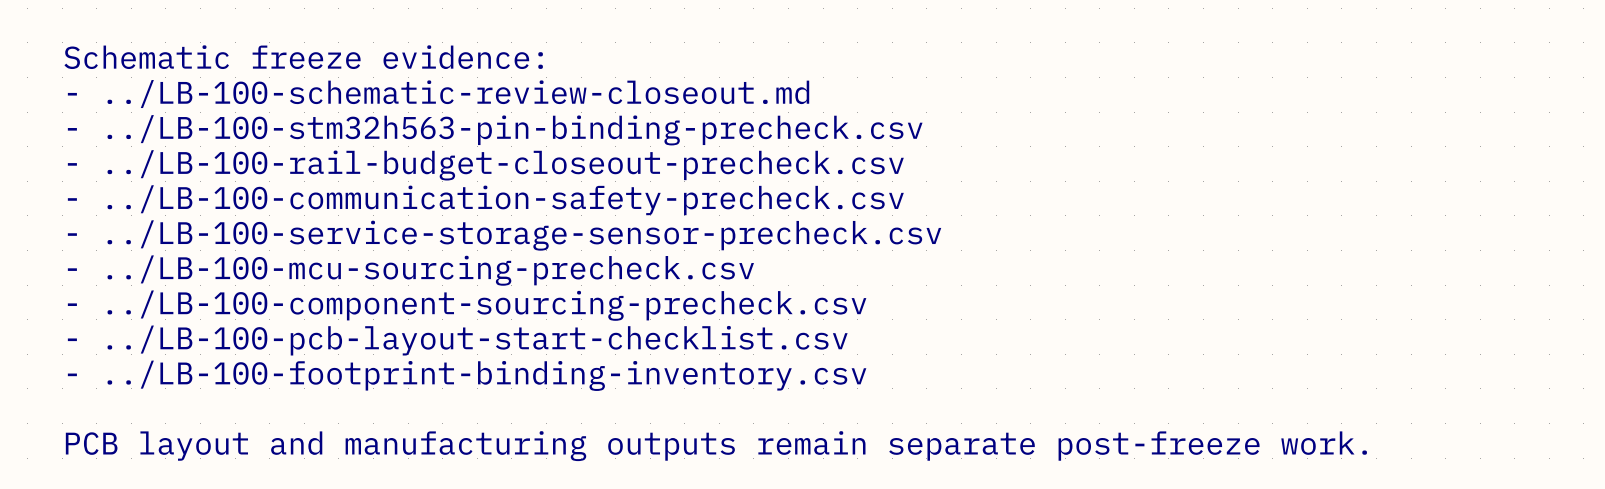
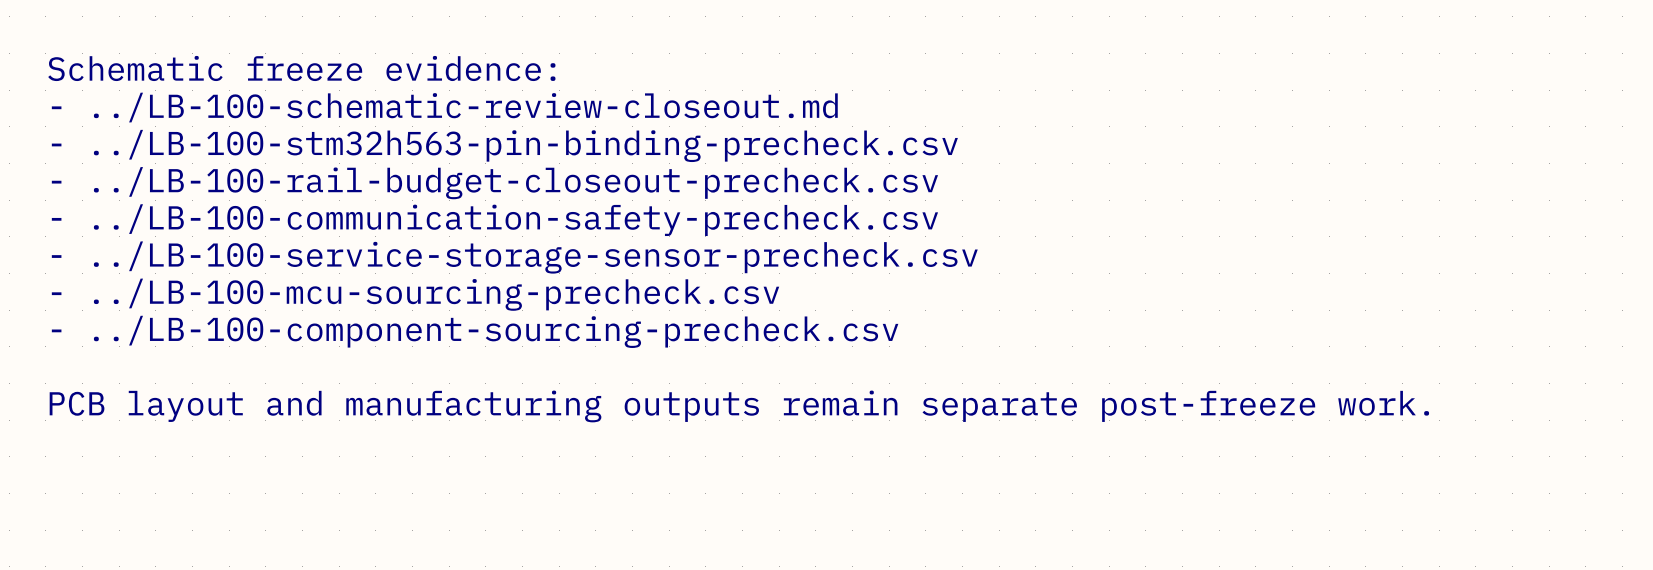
text: - ../LB-100-pcb-layout-start-checklist.csv (457, 340) -> none
text: - ../LB-100-footprint-binding-inventory.csv (467, 375) -> PCB layout and manufacturing outputs remain separate post-freeze work. (739, 406)
text: PCB layout and manufacturing outputs remain separate post-freeze work. (716, 446) -> none

